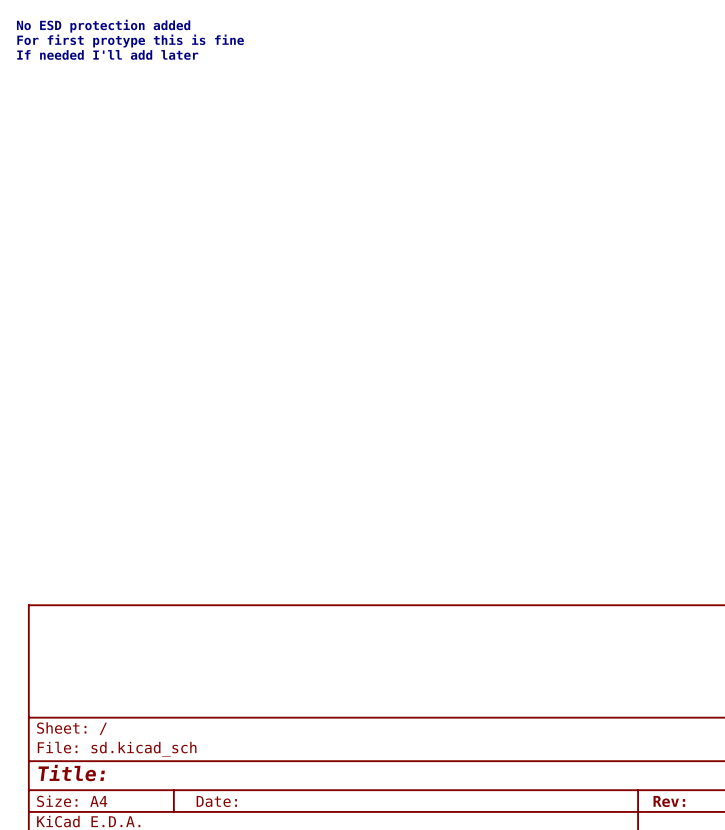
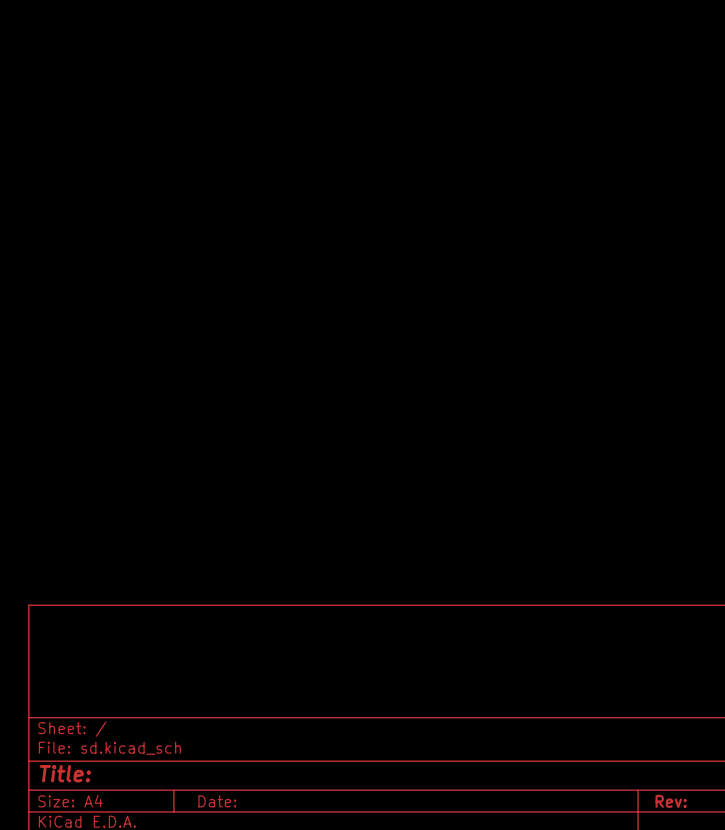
text: No ESD protection added (103, 26) -> none
text: For first protype this is fine (130, 41) -> none
text: If needed I'll add later (107, 54) -> none

